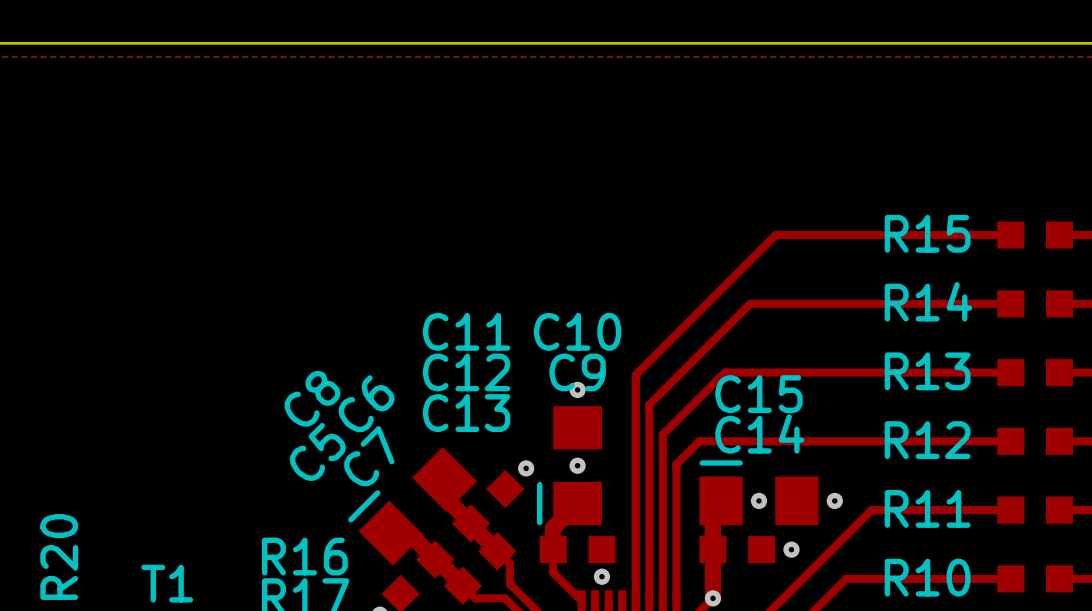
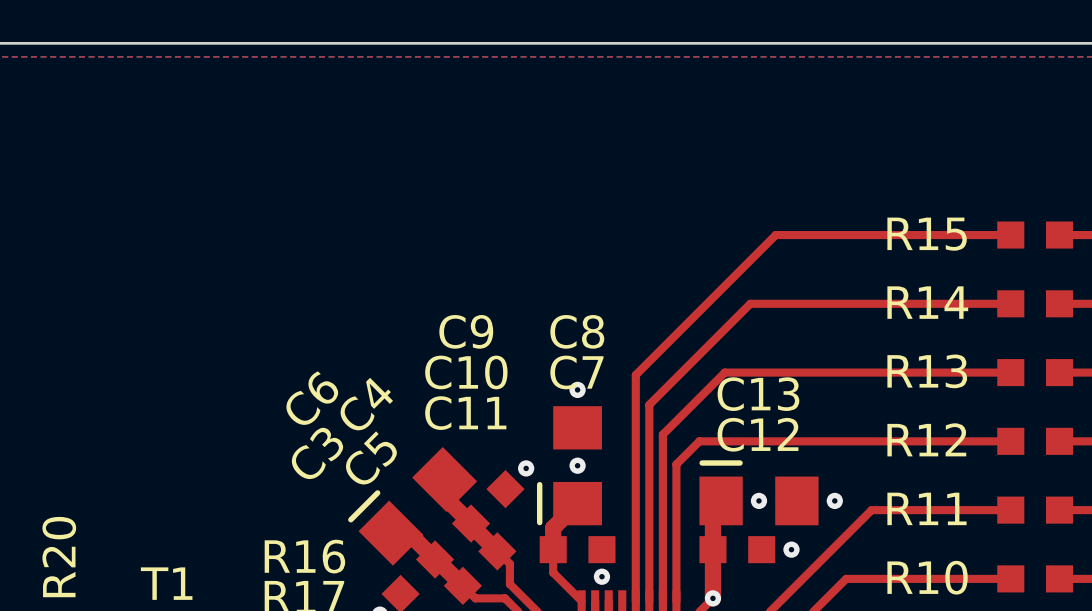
C11 name: C11 (466, 331) -> C9 (466, 331)
C10 name: C10 (577, 331) -> C8 (577, 331)
C12 name: C12 (466, 372) -> C10 (466, 372)
C9 name: C9 (577, 372) -> C7 (576, 372)
C15 name: C15 (758, 394) -> C13 (758, 394)
C8 name: C8 (312, 398) -> C6 (312, 398)
C6 name: C6 (366, 403) -> C4 (366, 404)
C13 name: C13 (466, 413) -> C11 (465, 413)
C14 name: C14 (759, 433) -> C12 (758, 434)
C5 name: C5 (317, 451) -> C3 (317, 453)
C7 name: C7 (369, 456) -> C5 (371, 458)

